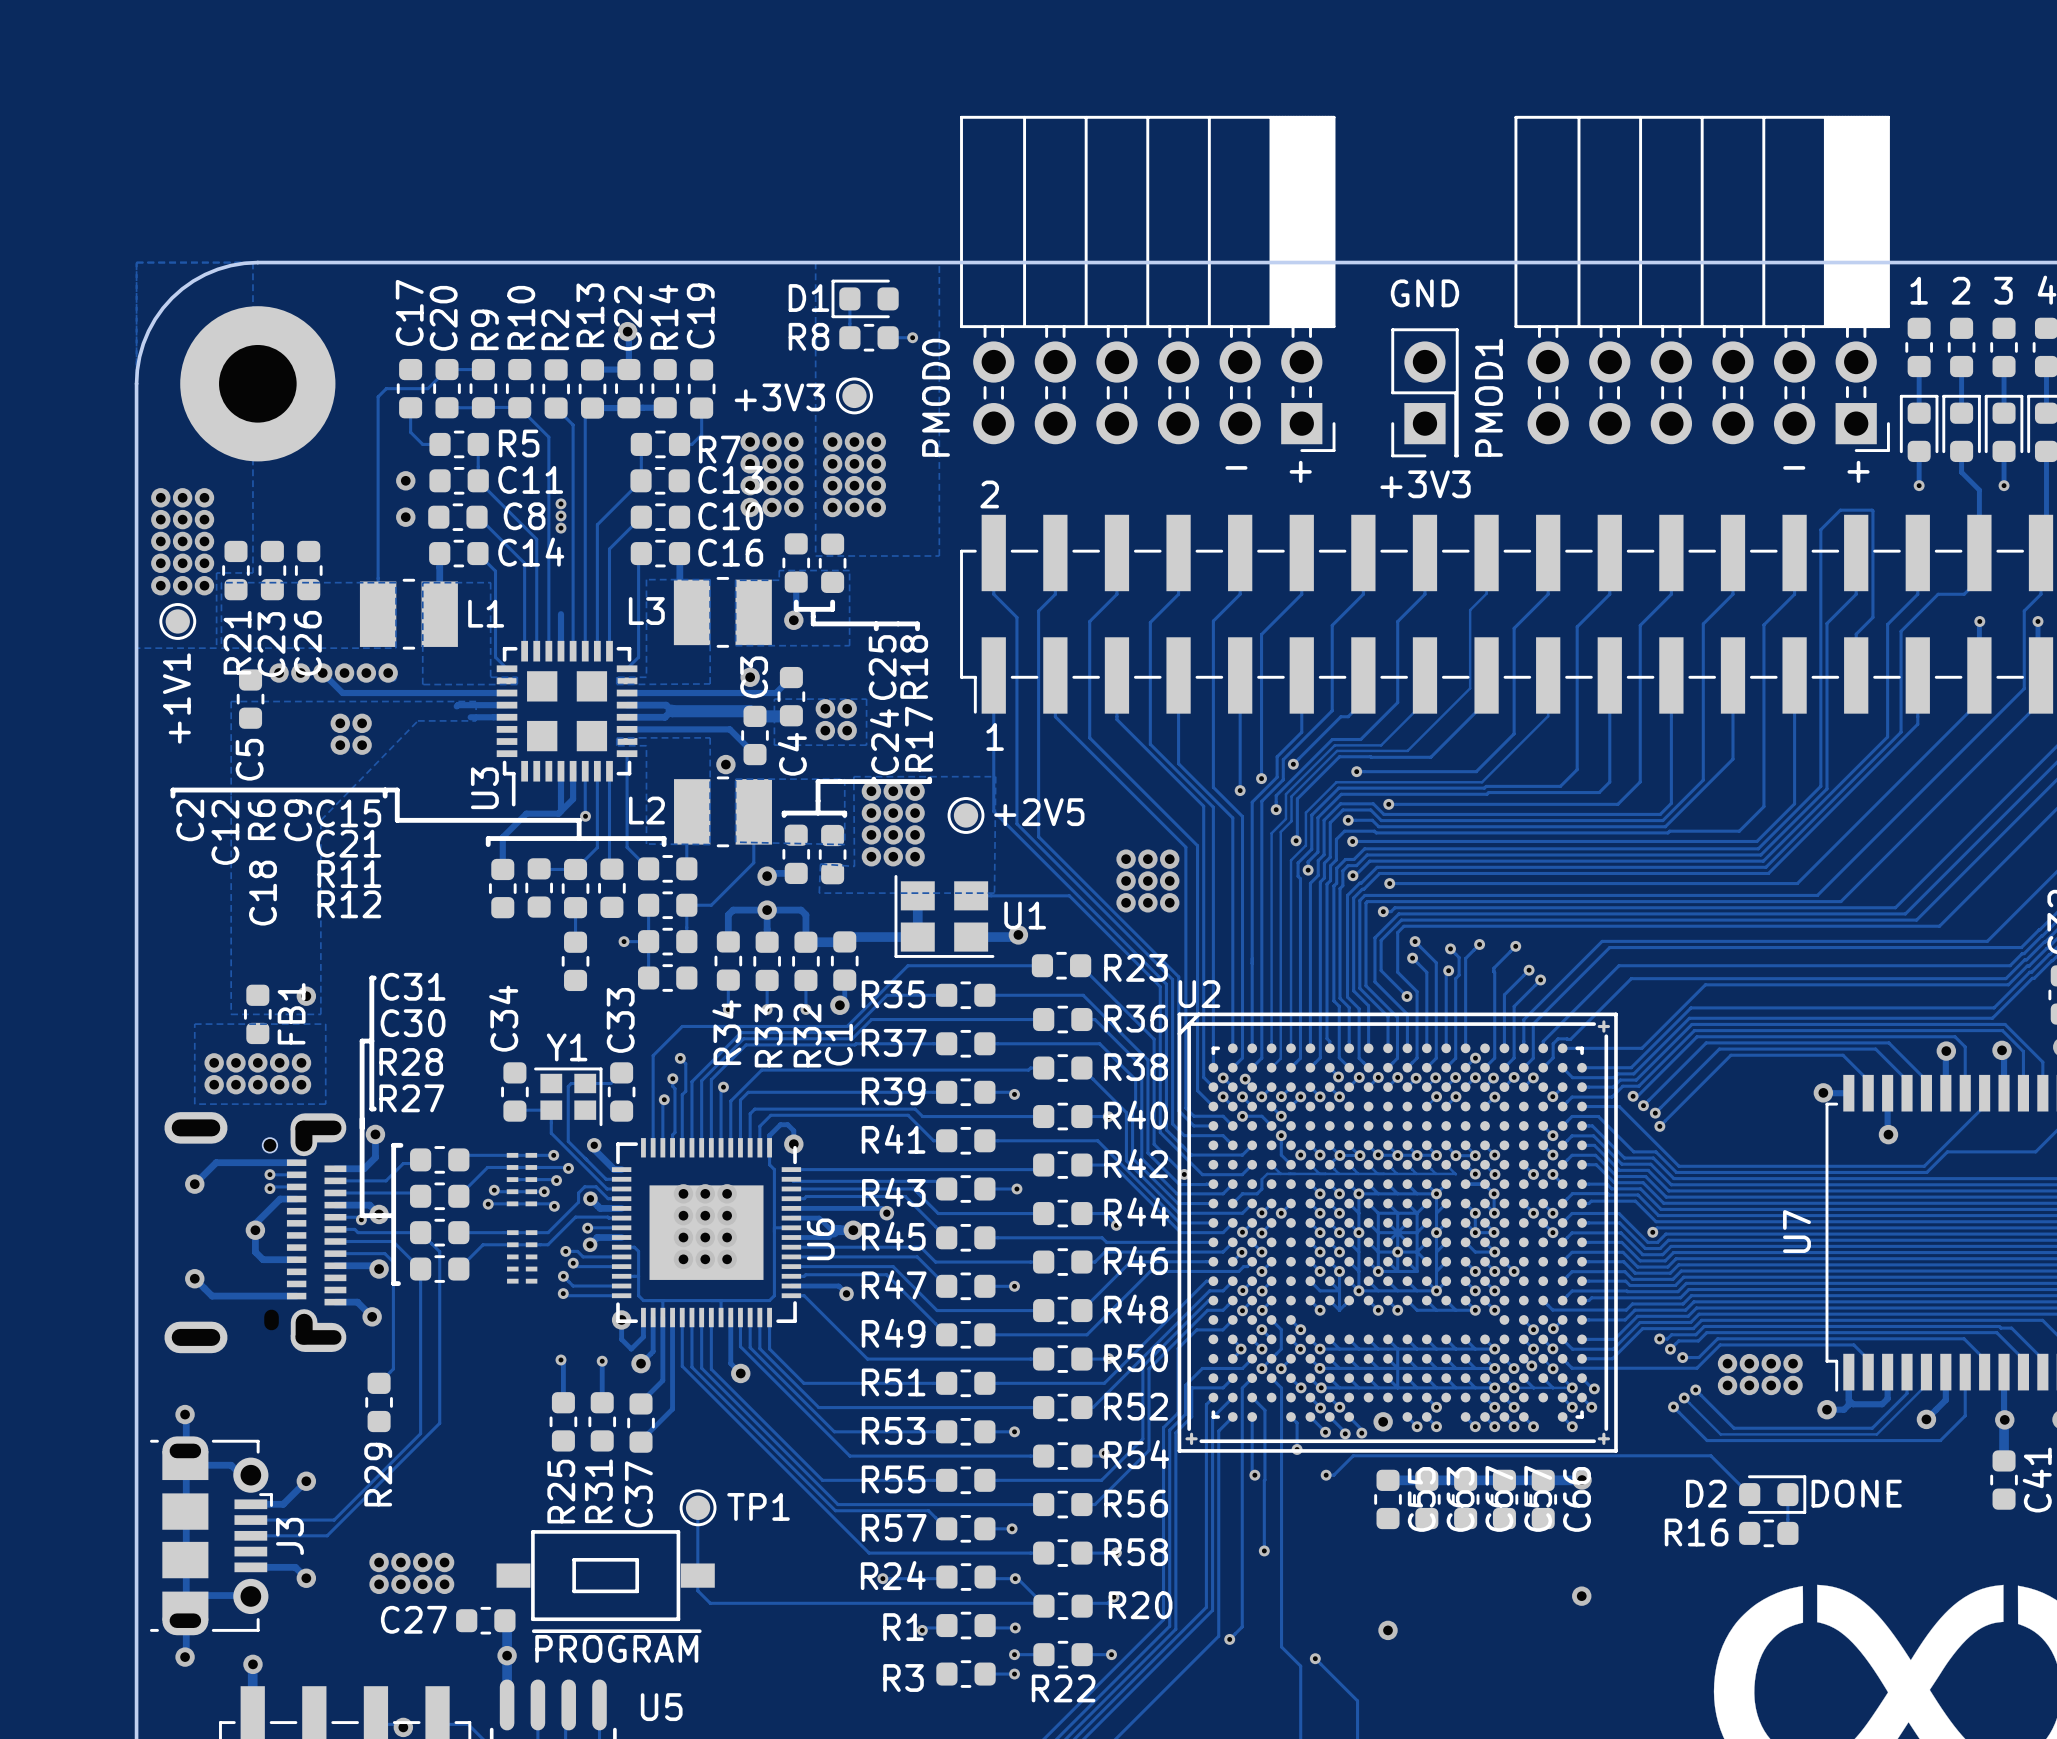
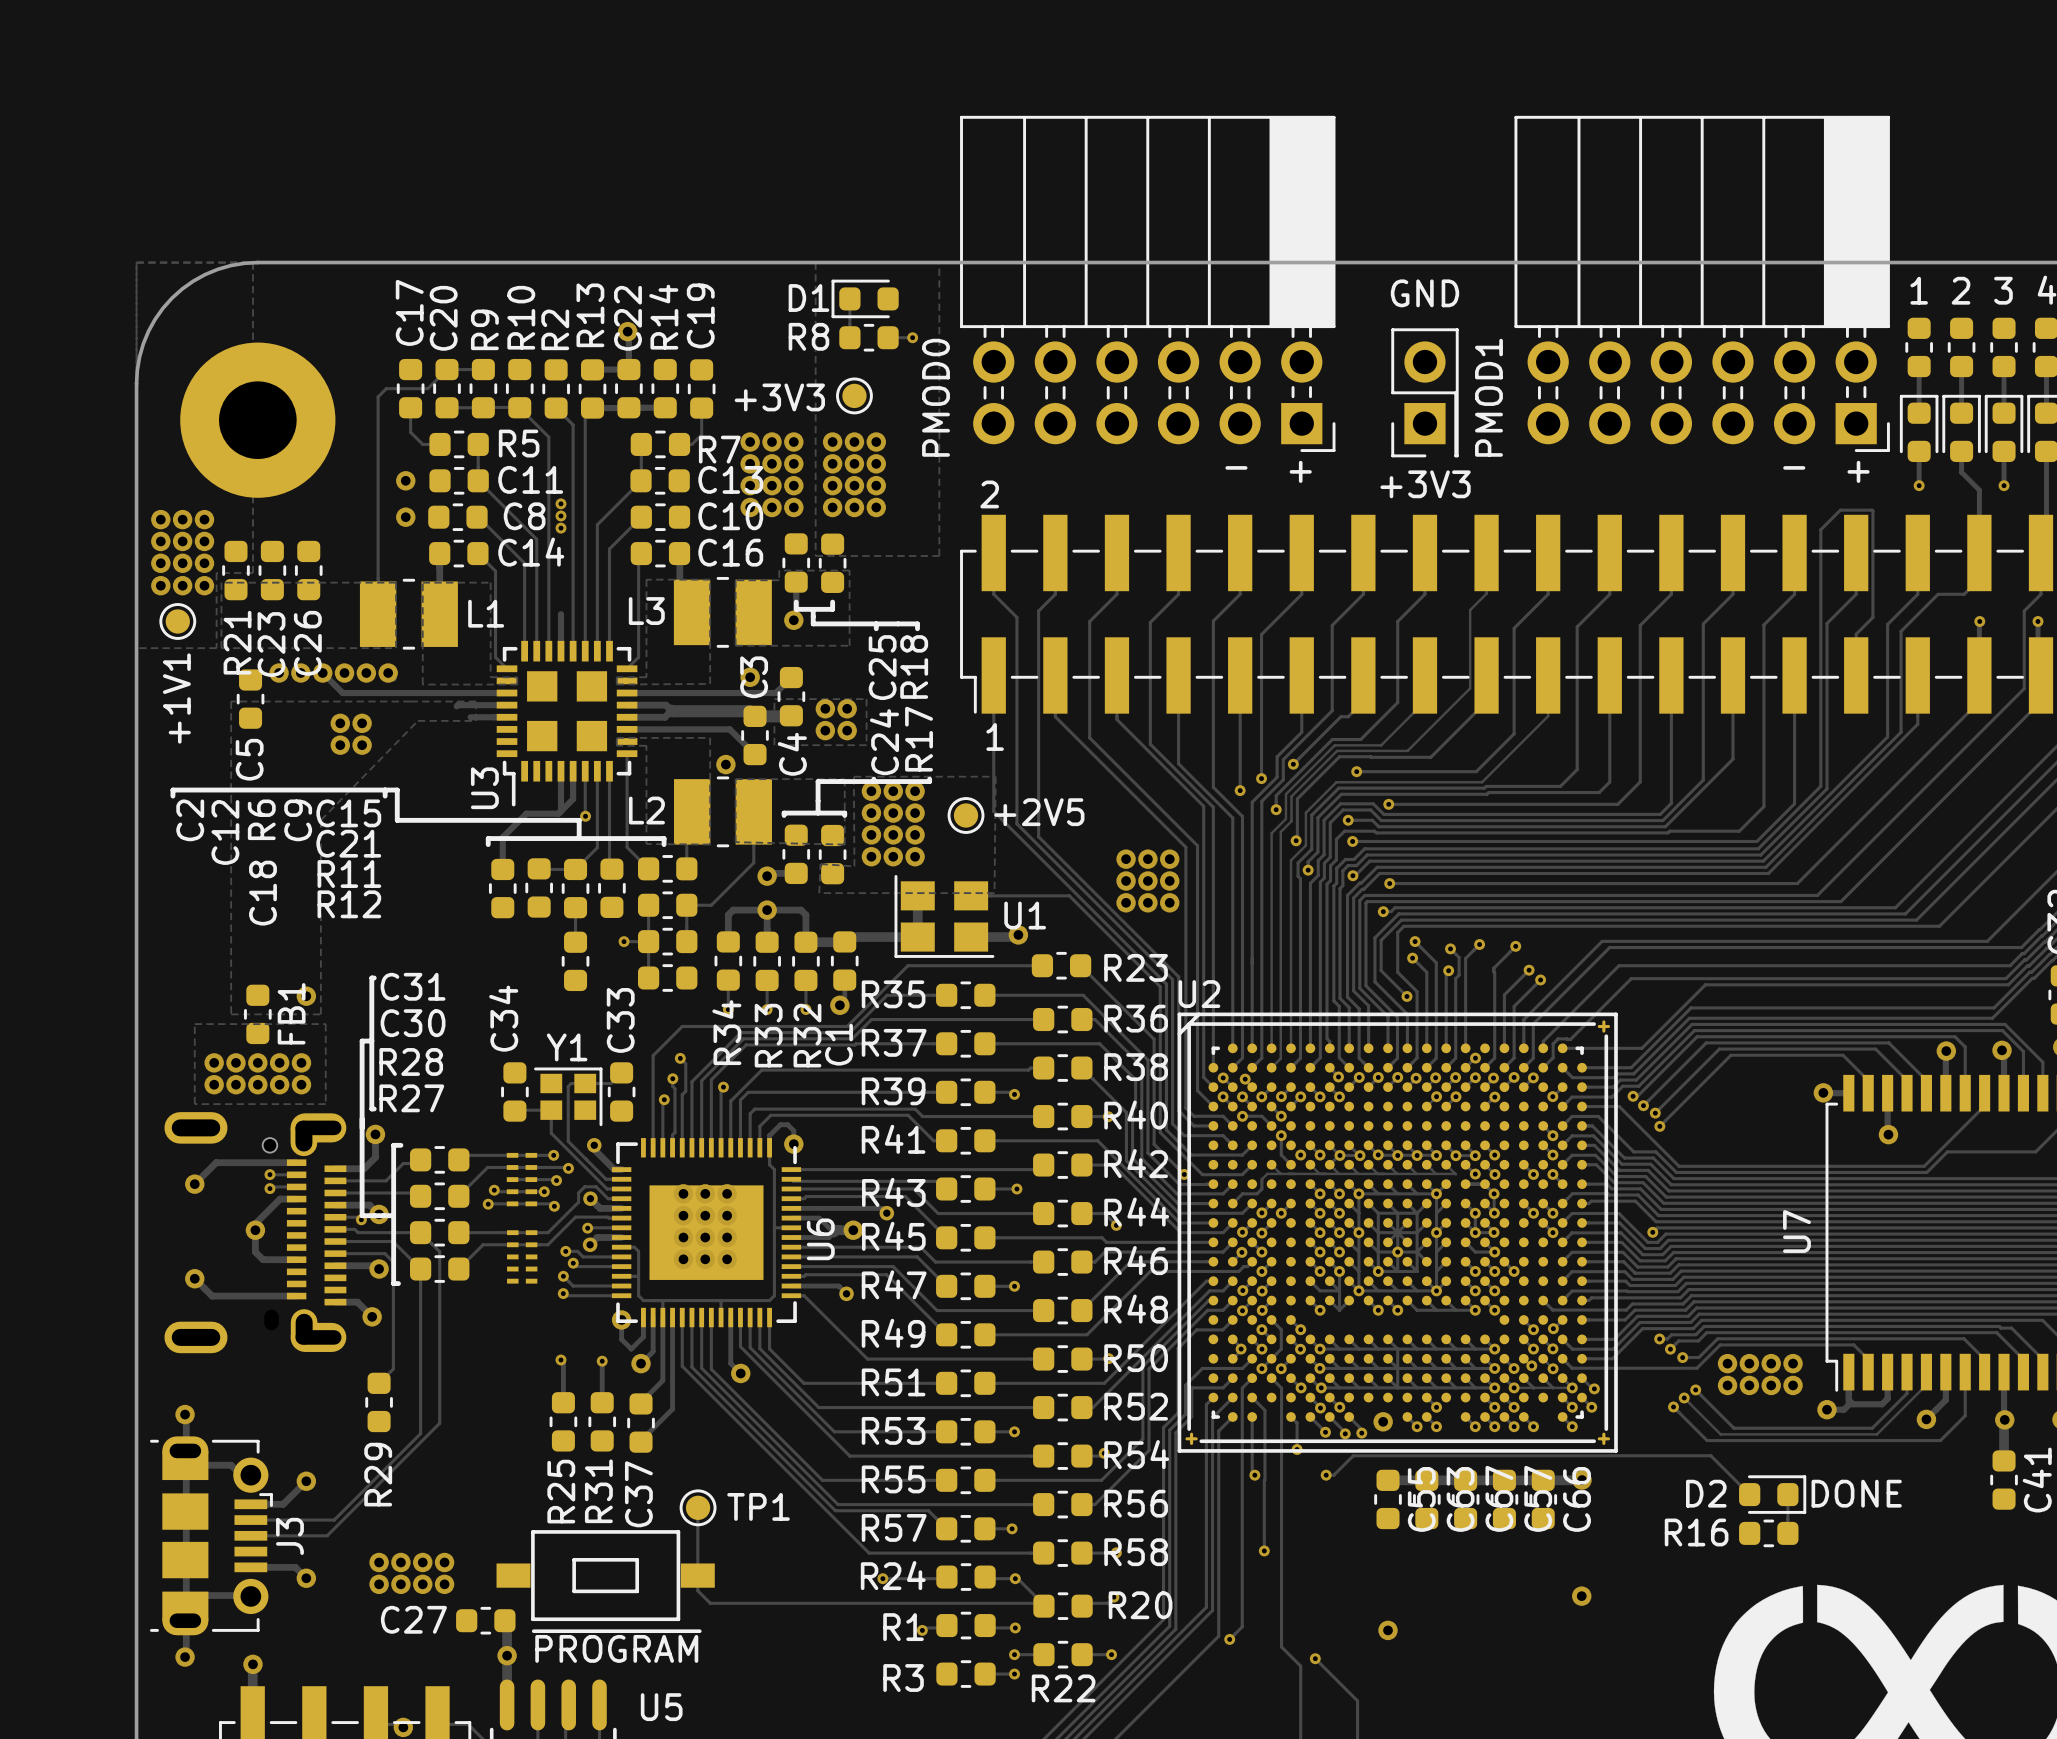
part position: (257, 383) -> (257, 420)
via: (160, 497) -> none
via: (182, 497) -> none
via: (204, 497) -> none

